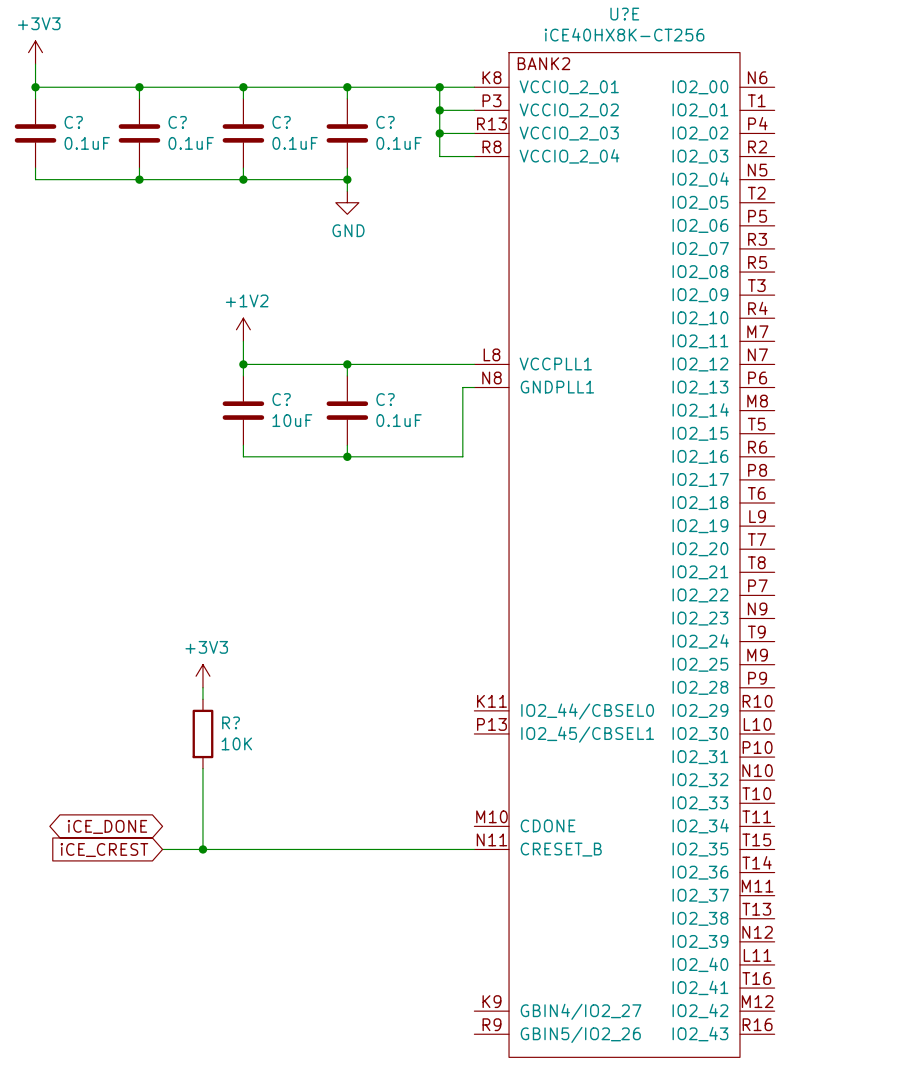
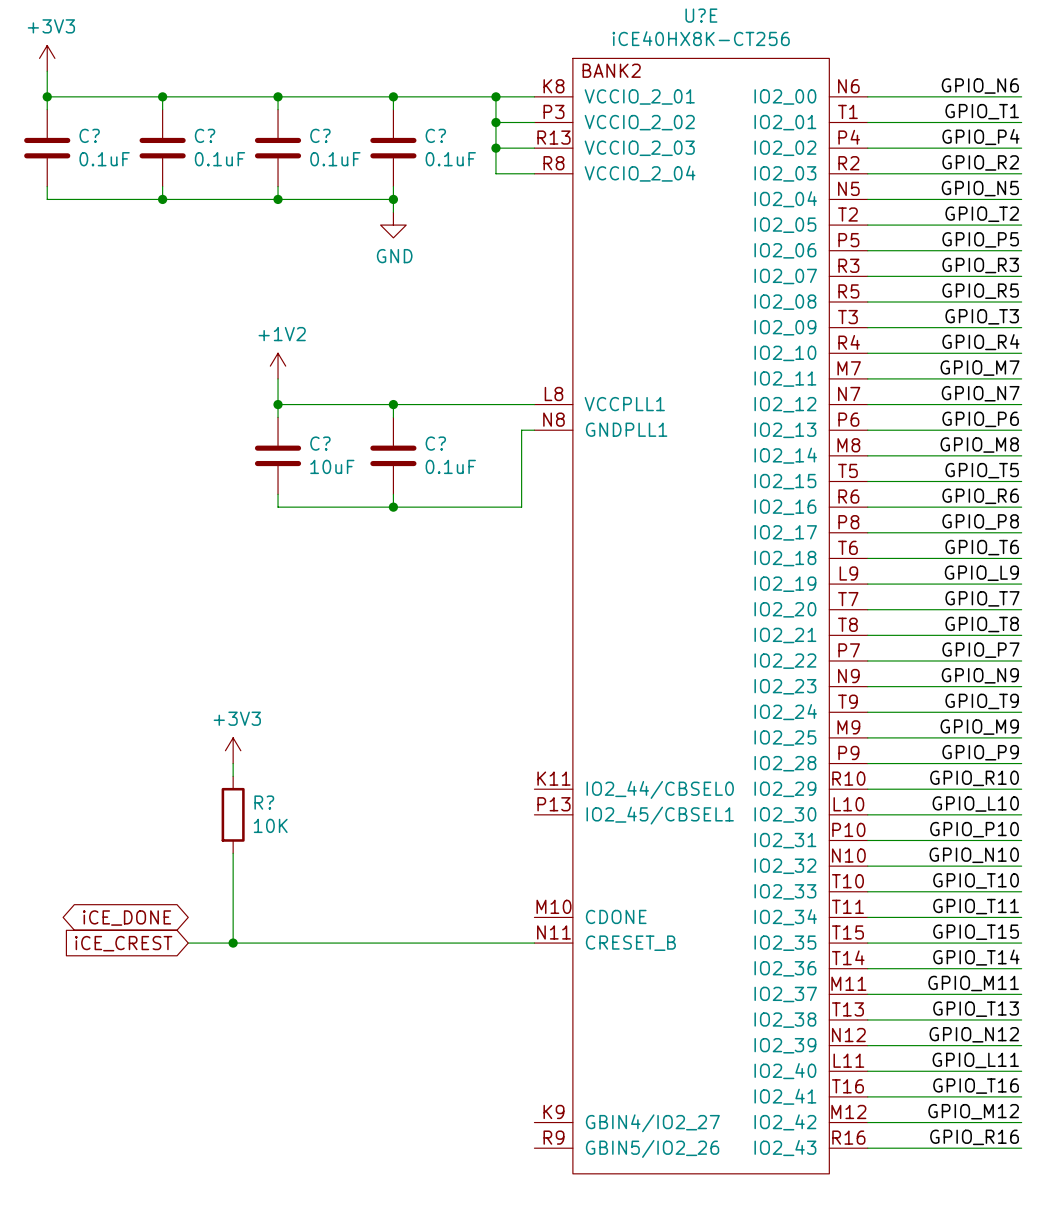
label: none -> GPIO_N6 (980, 86)
wire: none -> (867, 96) (1021, 96)
label: none -> GPIO_T1 (982, 111)
wire: none -> (867, 122) (1021, 122)
label: none -> GPIO_P4 (980, 137)
wire: none -> (867, 148) (1021, 148)
label: none -> GPIO_R2 (980, 162)
wire: none -> (867, 173) (1021, 173)
label: none -> GPIO_N5 (980, 188)
wire: none -> (867, 199) (1021, 199)
label: none -> GPIO_T2 (982, 214)
wire: none -> (867, 225) (1021, 225)
label: none -> GPIO_P5 (980, 239)
wire: none -> (867, 250) (1021, 250)
label: none -> GPIO_R3 (980, 265)
wire: none -> (867, 276) (1021, 276)
label: none -> GPIO_R5 (980, 291)
wire: none -> (867, 302) (1021, 302)
label: none -> GPIO_T3 (982, 316)
wire: none -> (867, 327) (1021, 327)
label: none -> GPIO_R4 (980, 342)
wire: none -> (867, 353) (1021, 353)
label: none -> GPIO_M7 (980, 368)
wire: none -> (867, 378) (1021, 378)
label: none -> GPIO_N7 (980, 393)
wire: none -> (867, 404) (1021, 404)
label: none -> GPIO_P6 (980, 419)
wire: none -> (867, 430) (1021, 430)
label: none -> GPIO_M8 (979, 445)
wire: none -> (867, 455) (1021, 455)
label: none -> GPIO_T5 (982, 470)
wire: none -> (867, 481) (1021, 481)
label: none -> GPIO_R6 (980, 496)
wire: none -> (867, 507) (1021, 507)
label: none -> GPIO_P8 (980, 521)
wire: none -> (867, 532) (1021, 532)
label: none -> GPIO_T6 (982, 547)
wire: none -> (867, 558) (1021, 558)
label: none -> GPIO_L9 (981, 573)
wire: none -> (867, 584) (1021, 584)
label: none -> GPIO_T7 (982, 598)
wire: none -> (867, 609) (1021, 609)
label: none -> GPIO_T8 (982, 624)
wire: none -> (867, 635) (1021, 635)
label: none -> GPIO_P7 (980, 650)
wire: none -> (867, 660) (1021, 660)
label: none -> GPIO_N9 (980, 675)
wire: none -> (867, 686) (1021, 686)
label: none -> GPIO_T9 (982, 701)
wire: none -> (867, 712) (1021, 712)
label: none -> GPIO_M9 (979, 727)
wire: none -> (867, 737) (1021, 737)
label: none -> GPIO_P9 (980, 752)
wire: none -> (867, 763) (1021, 763)
label: none -> GPIO_R10 (974, 778)
wire: none -> (867, 789) (1021, 789)
label: none -> GPIO_L10 (975, 804)
wire: none -> (867, 814) (1021, 814)
label: none -> GPIO_P10 (974, 829)
wire: none -> (867, 840) (1021, 840)
label: none -> GPIO_N10 (974, 855)
wire: none -> (867, 866) (1021, 866)
label: none -> GPIO_T10 (976, 880)
wire: none -> (867, 891) (1021, 891)
label: none -> GPIO_T11 (976, 906)
wire: none -> (867, 917) (1021, 917)
label: none -> GPIO_T15 (976, 932)
wire: none -> (867, 943) (1021, 943)
label: none -> GPIO_T14 (976, 957)
wire: none -> (867, 968) (1021, 968)
label: none -> GPIO_M11 (973, 983)
wire: none -> (867, 994) (1021, 994)
label: none -> GPIO_T13 (976, 1009)
wire: none -> (867, 1019) (1021, 1019)
label: none -> GPIO_N12 (974, 1034)
wire: none -> (867, 1045) (1021, 1045)
label: none -> GPIO_L11 (975, 1060)
wire: none -> (867, 1071) (1021, 1071)
label: none -> GPIO_T16 (976, 1086)
wire: none -> (867, 1096) (1021, 1096)
label: none -> GPIO_M12 (973, 1111)
wire: none -> (867, 1122) (1021, 1122)
label: none -> GPIO_R16 (974, 1137)
wire: none -> (867, 1148) (1021, 1148)

